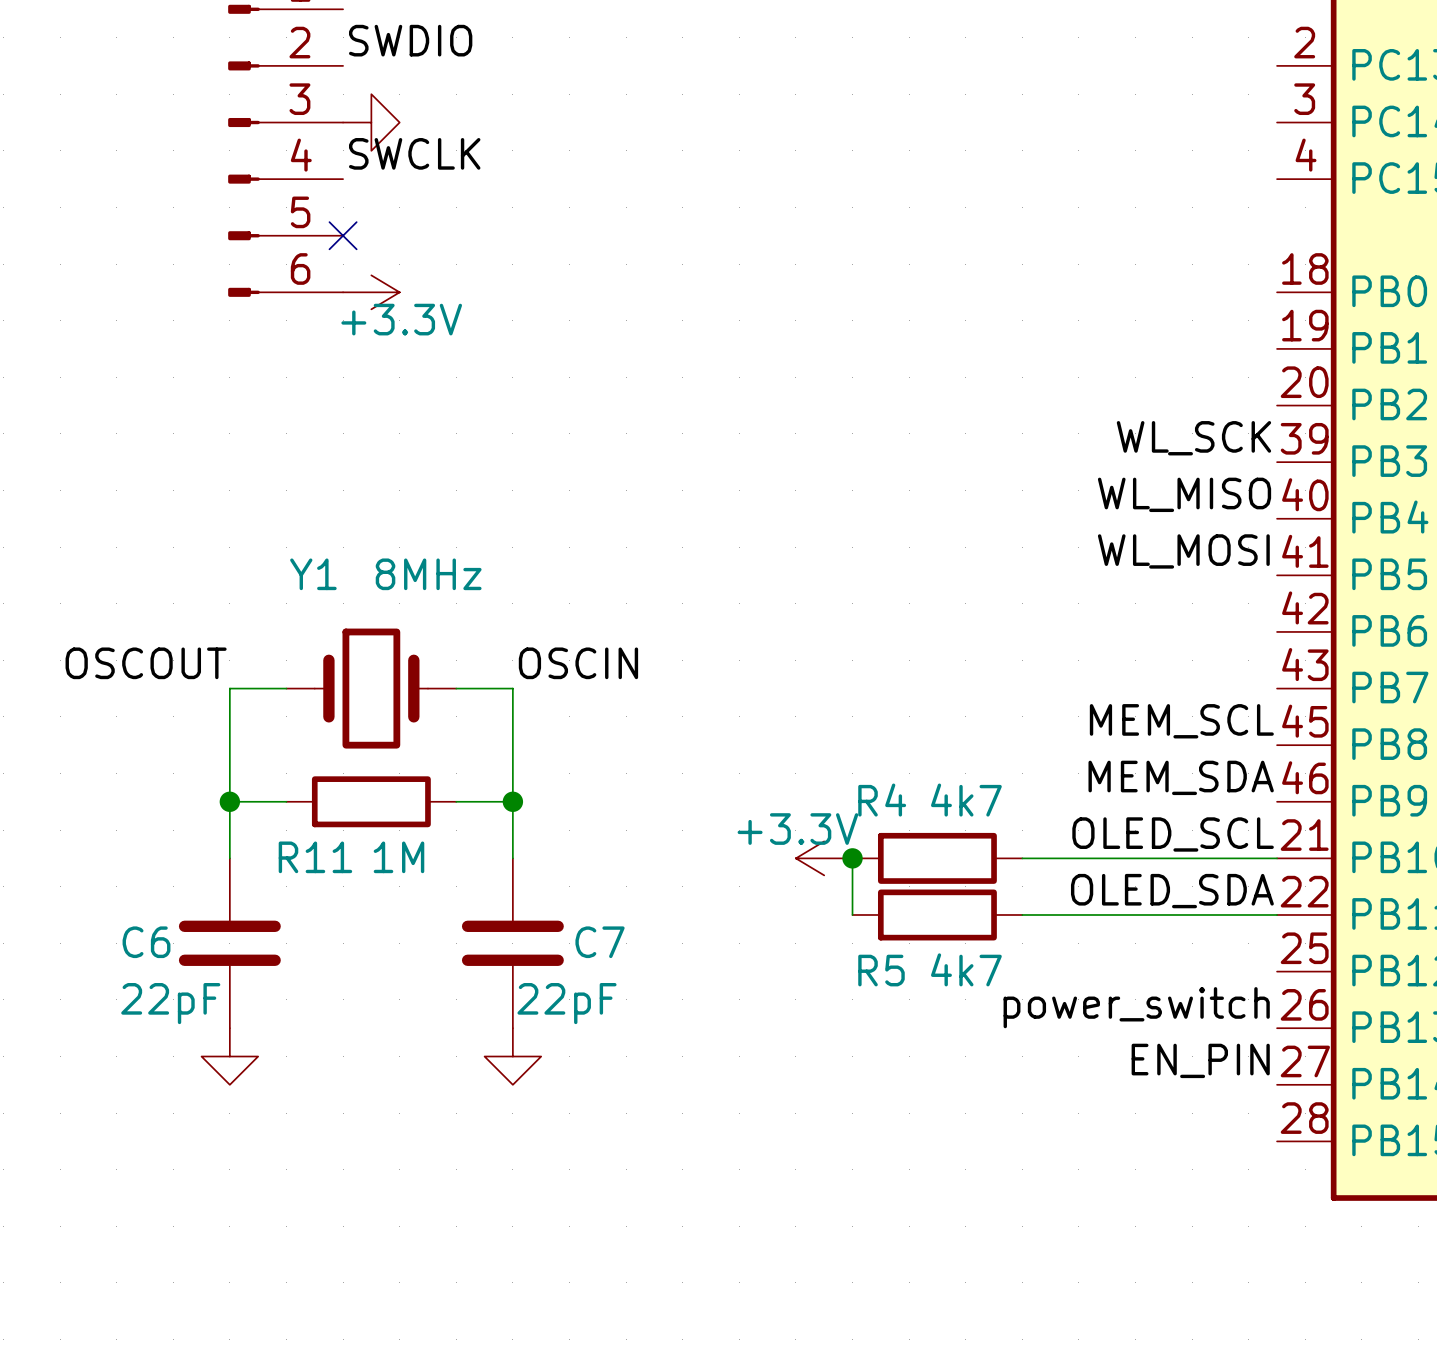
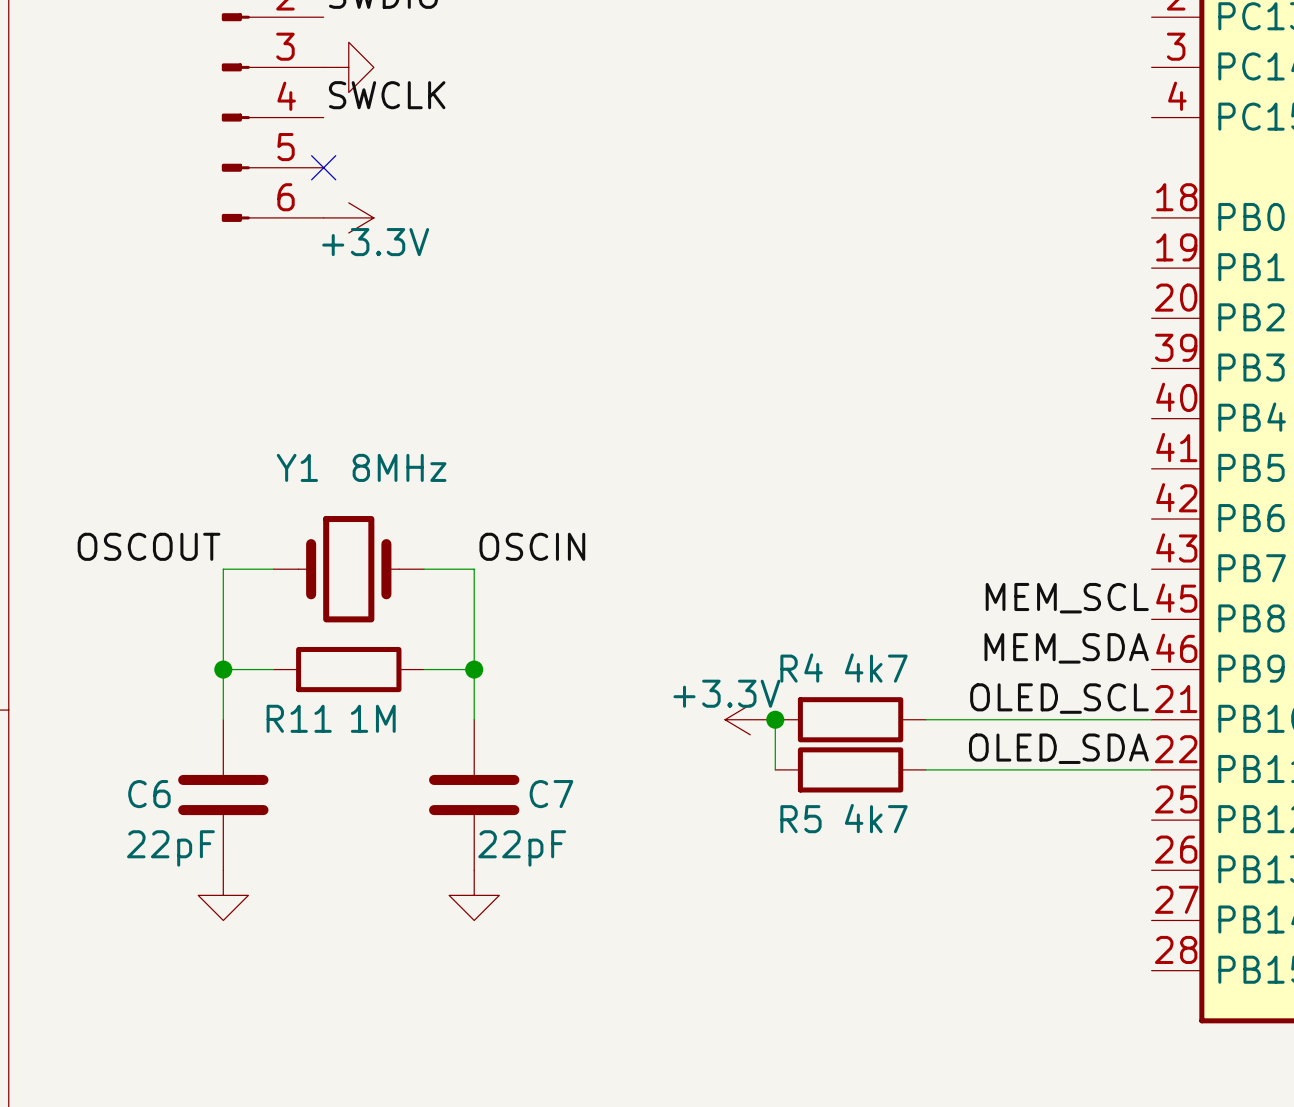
label: WL_SCK (1193, 438) -> none
label: WL_MISO (1184, 494) -> none
label: WL_MOSI (1183, 551) -> none
label: power_switch (1136, 1007) -> none
label: EN_PIN (1200, 1060) -> none

